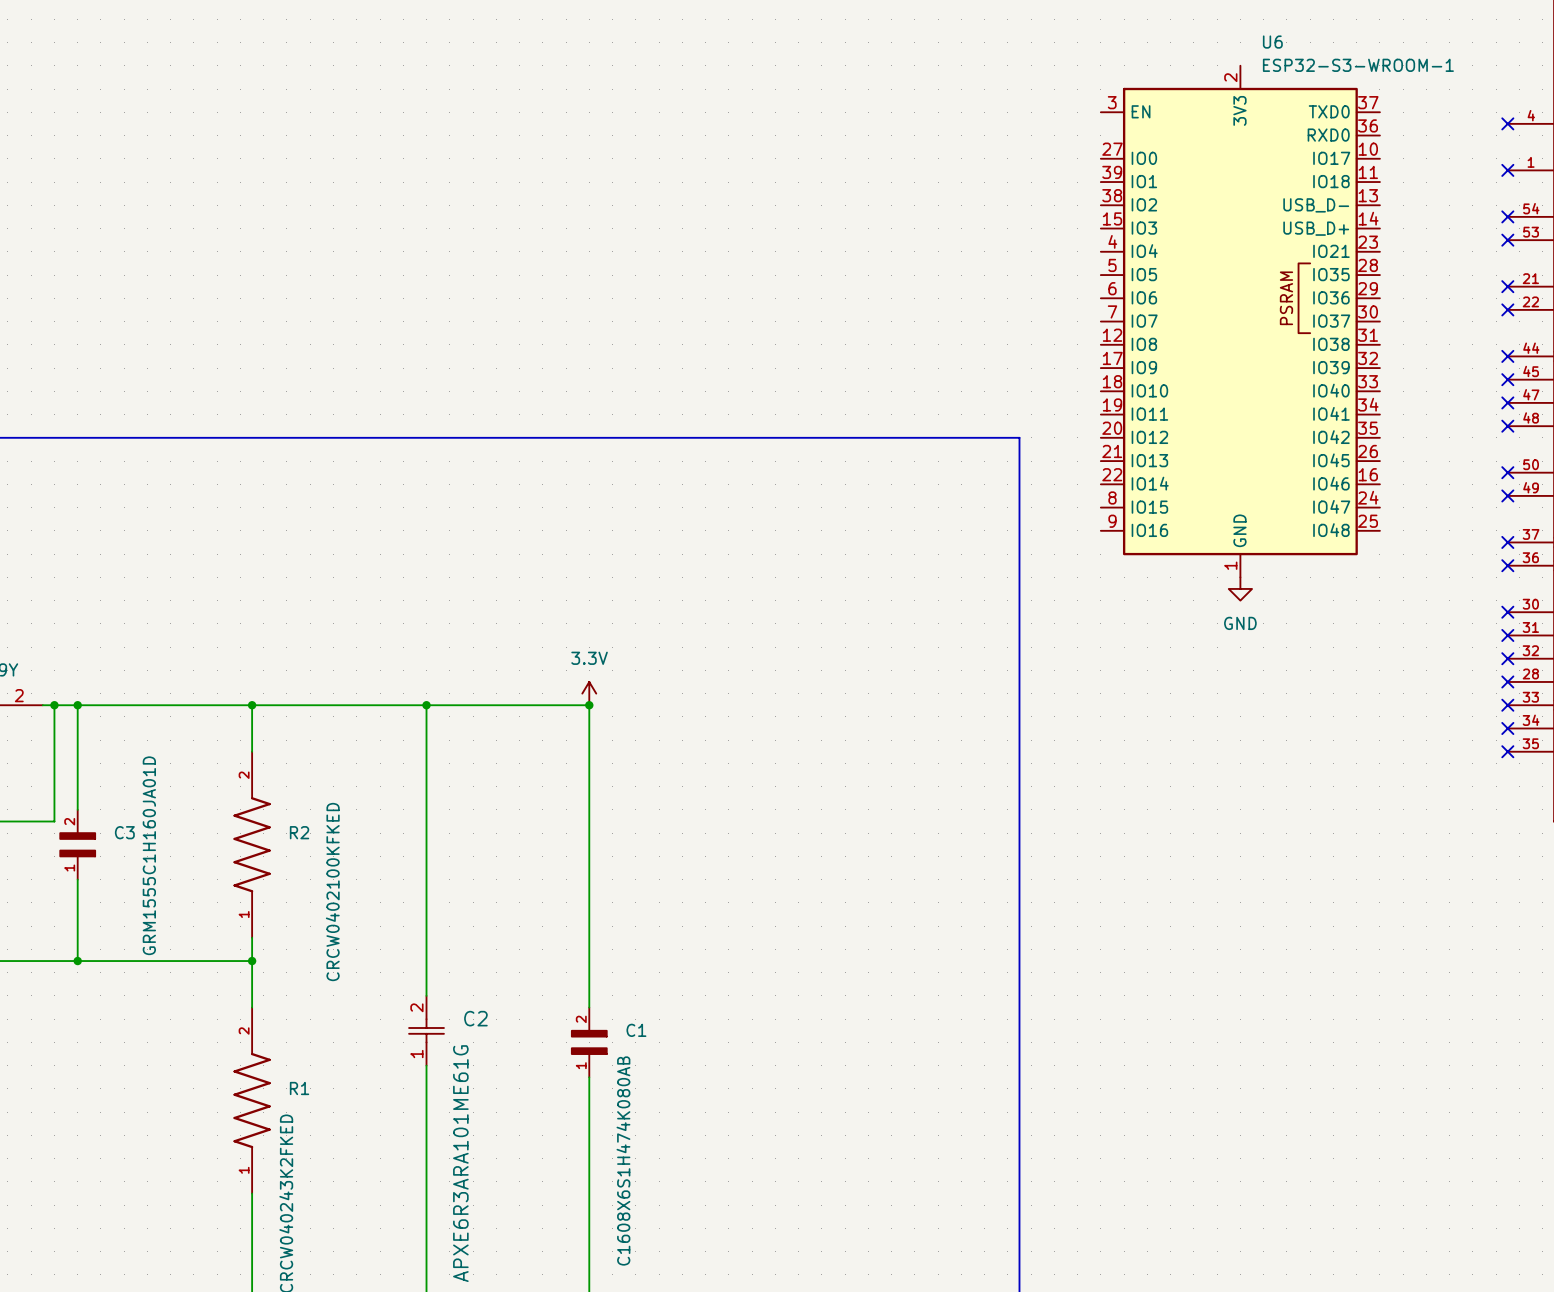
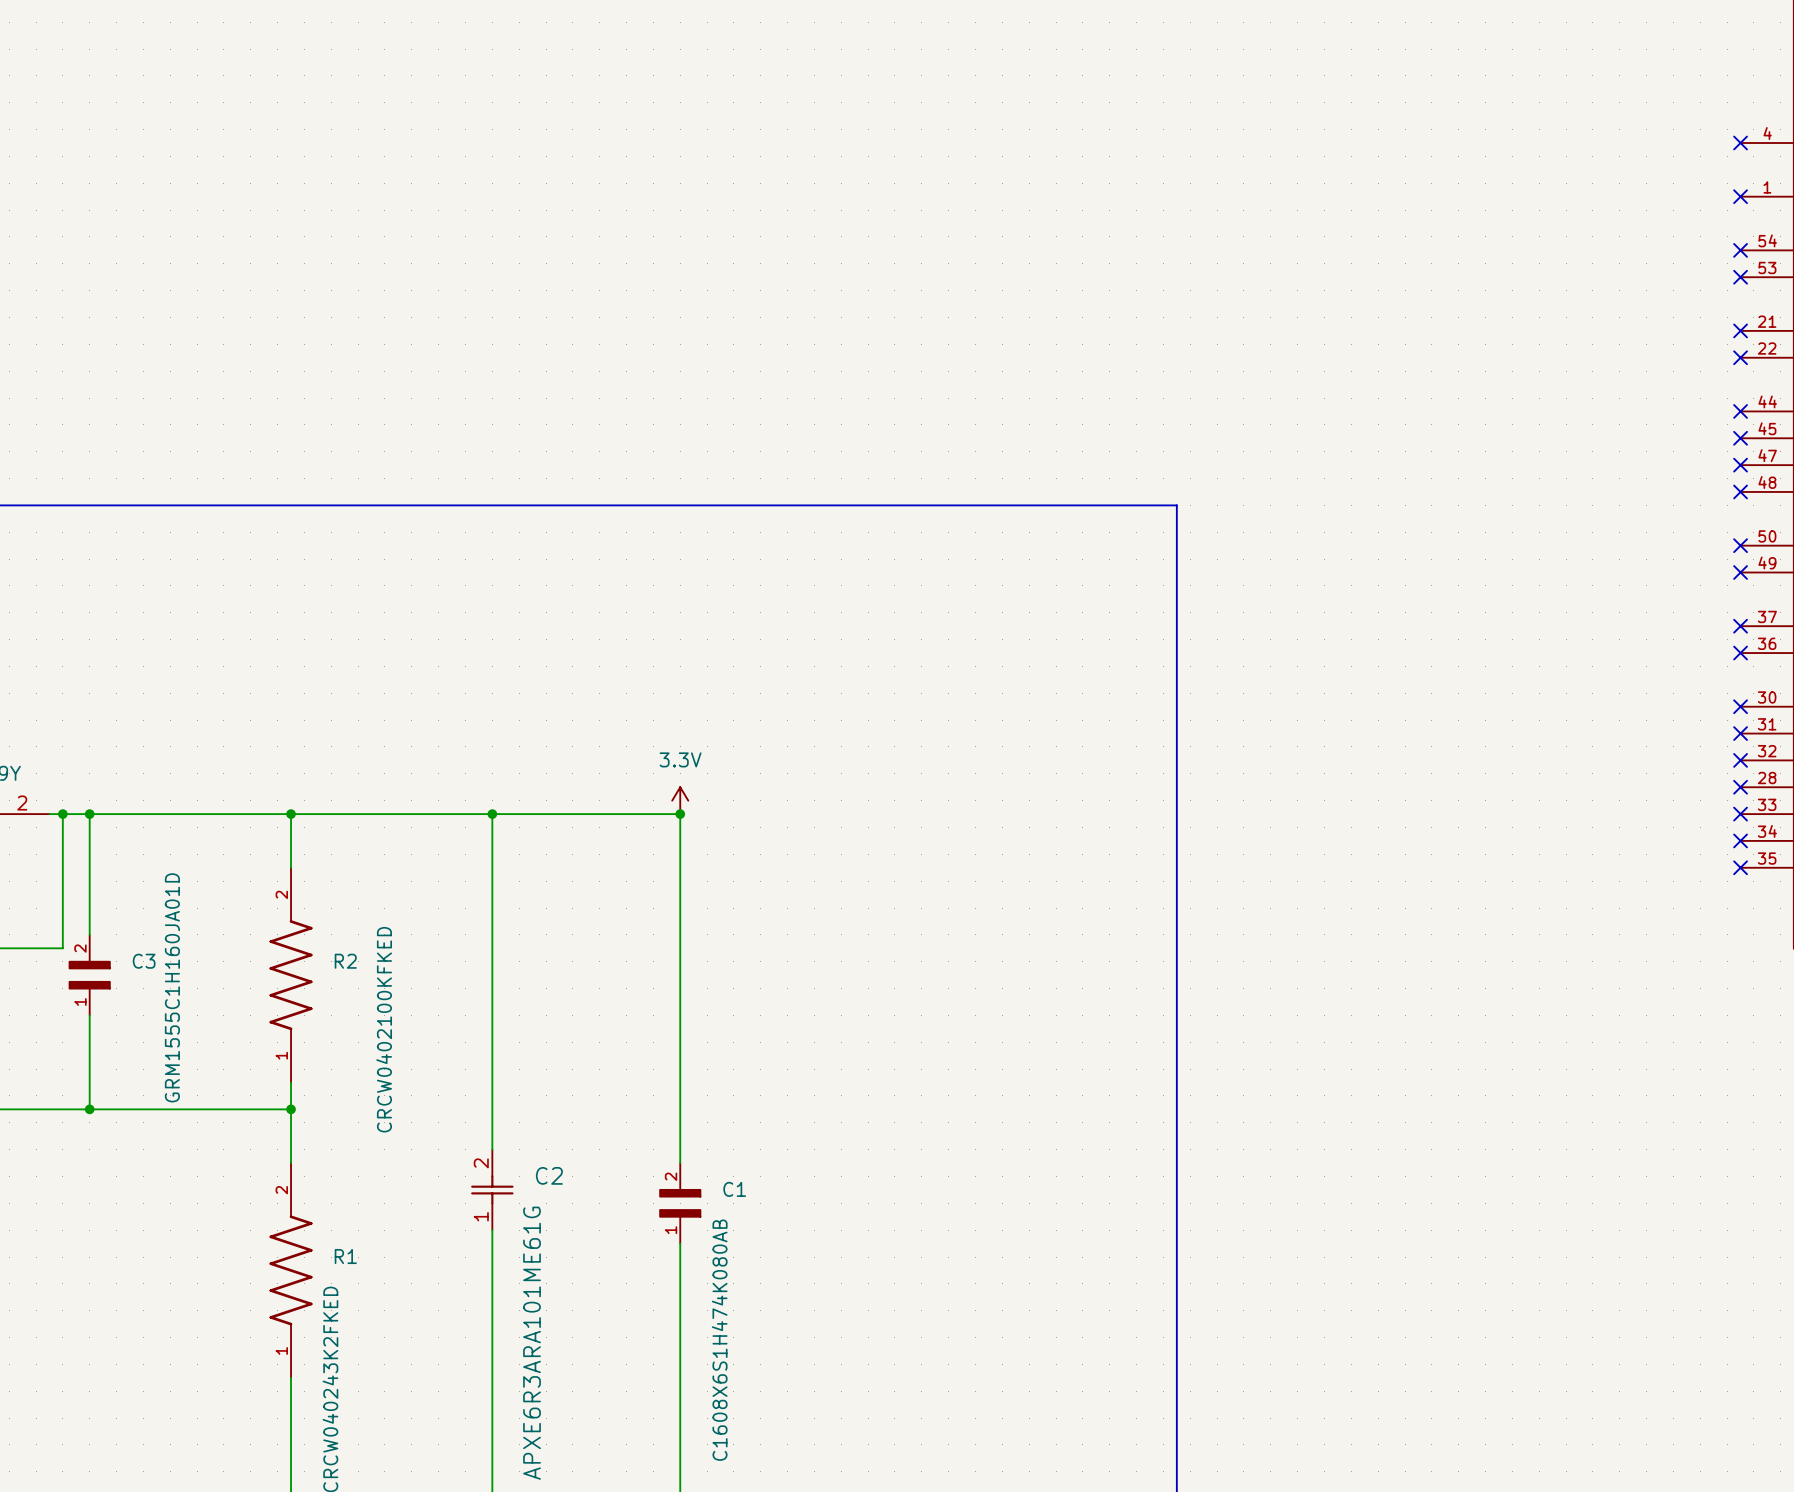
U6: ESP32-S3-WROOM-1 (1240, 321) -> none
power symbol: GND (1240, 588) -> none

